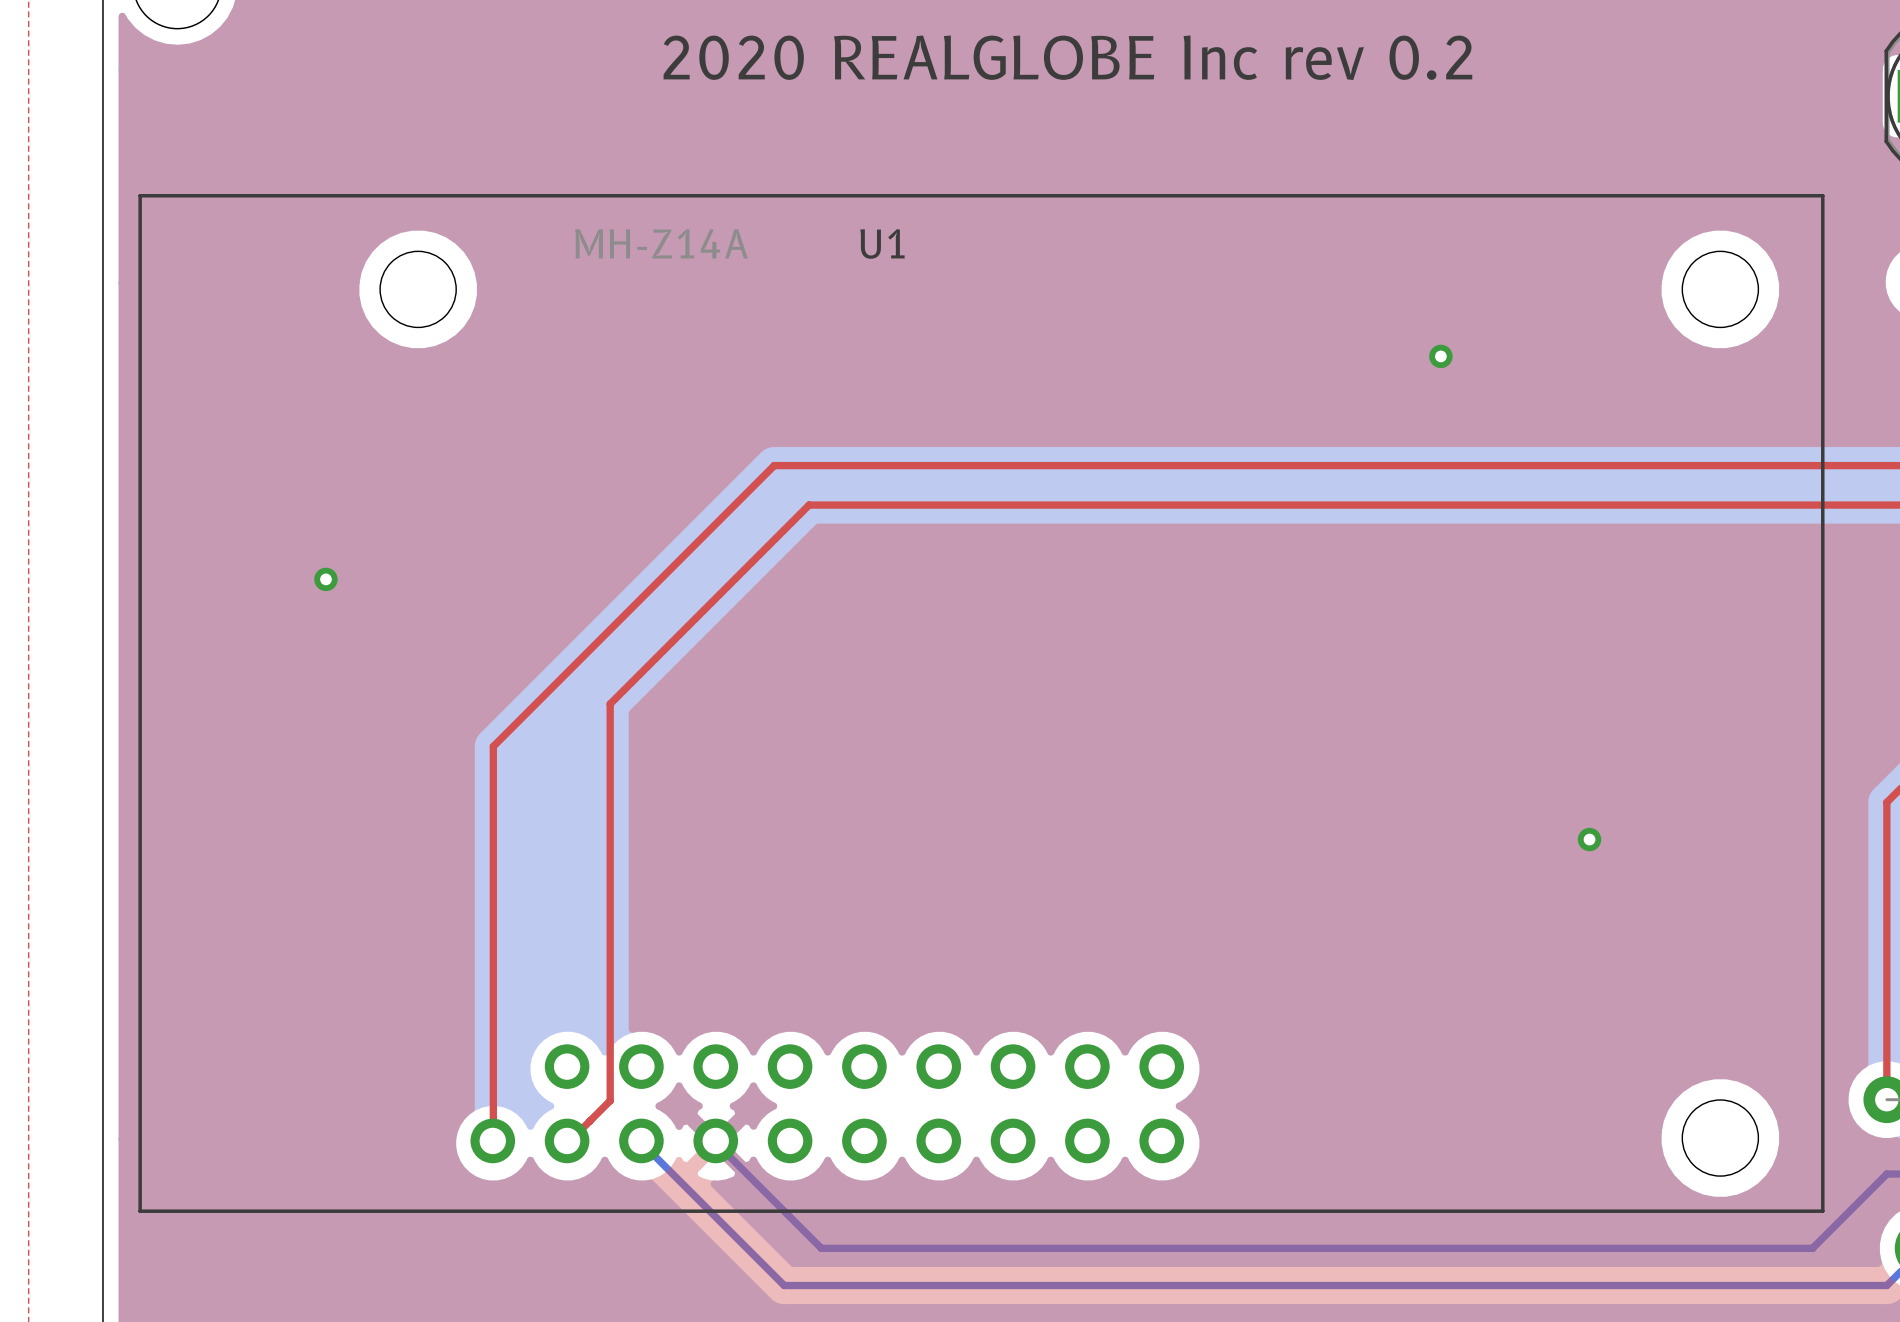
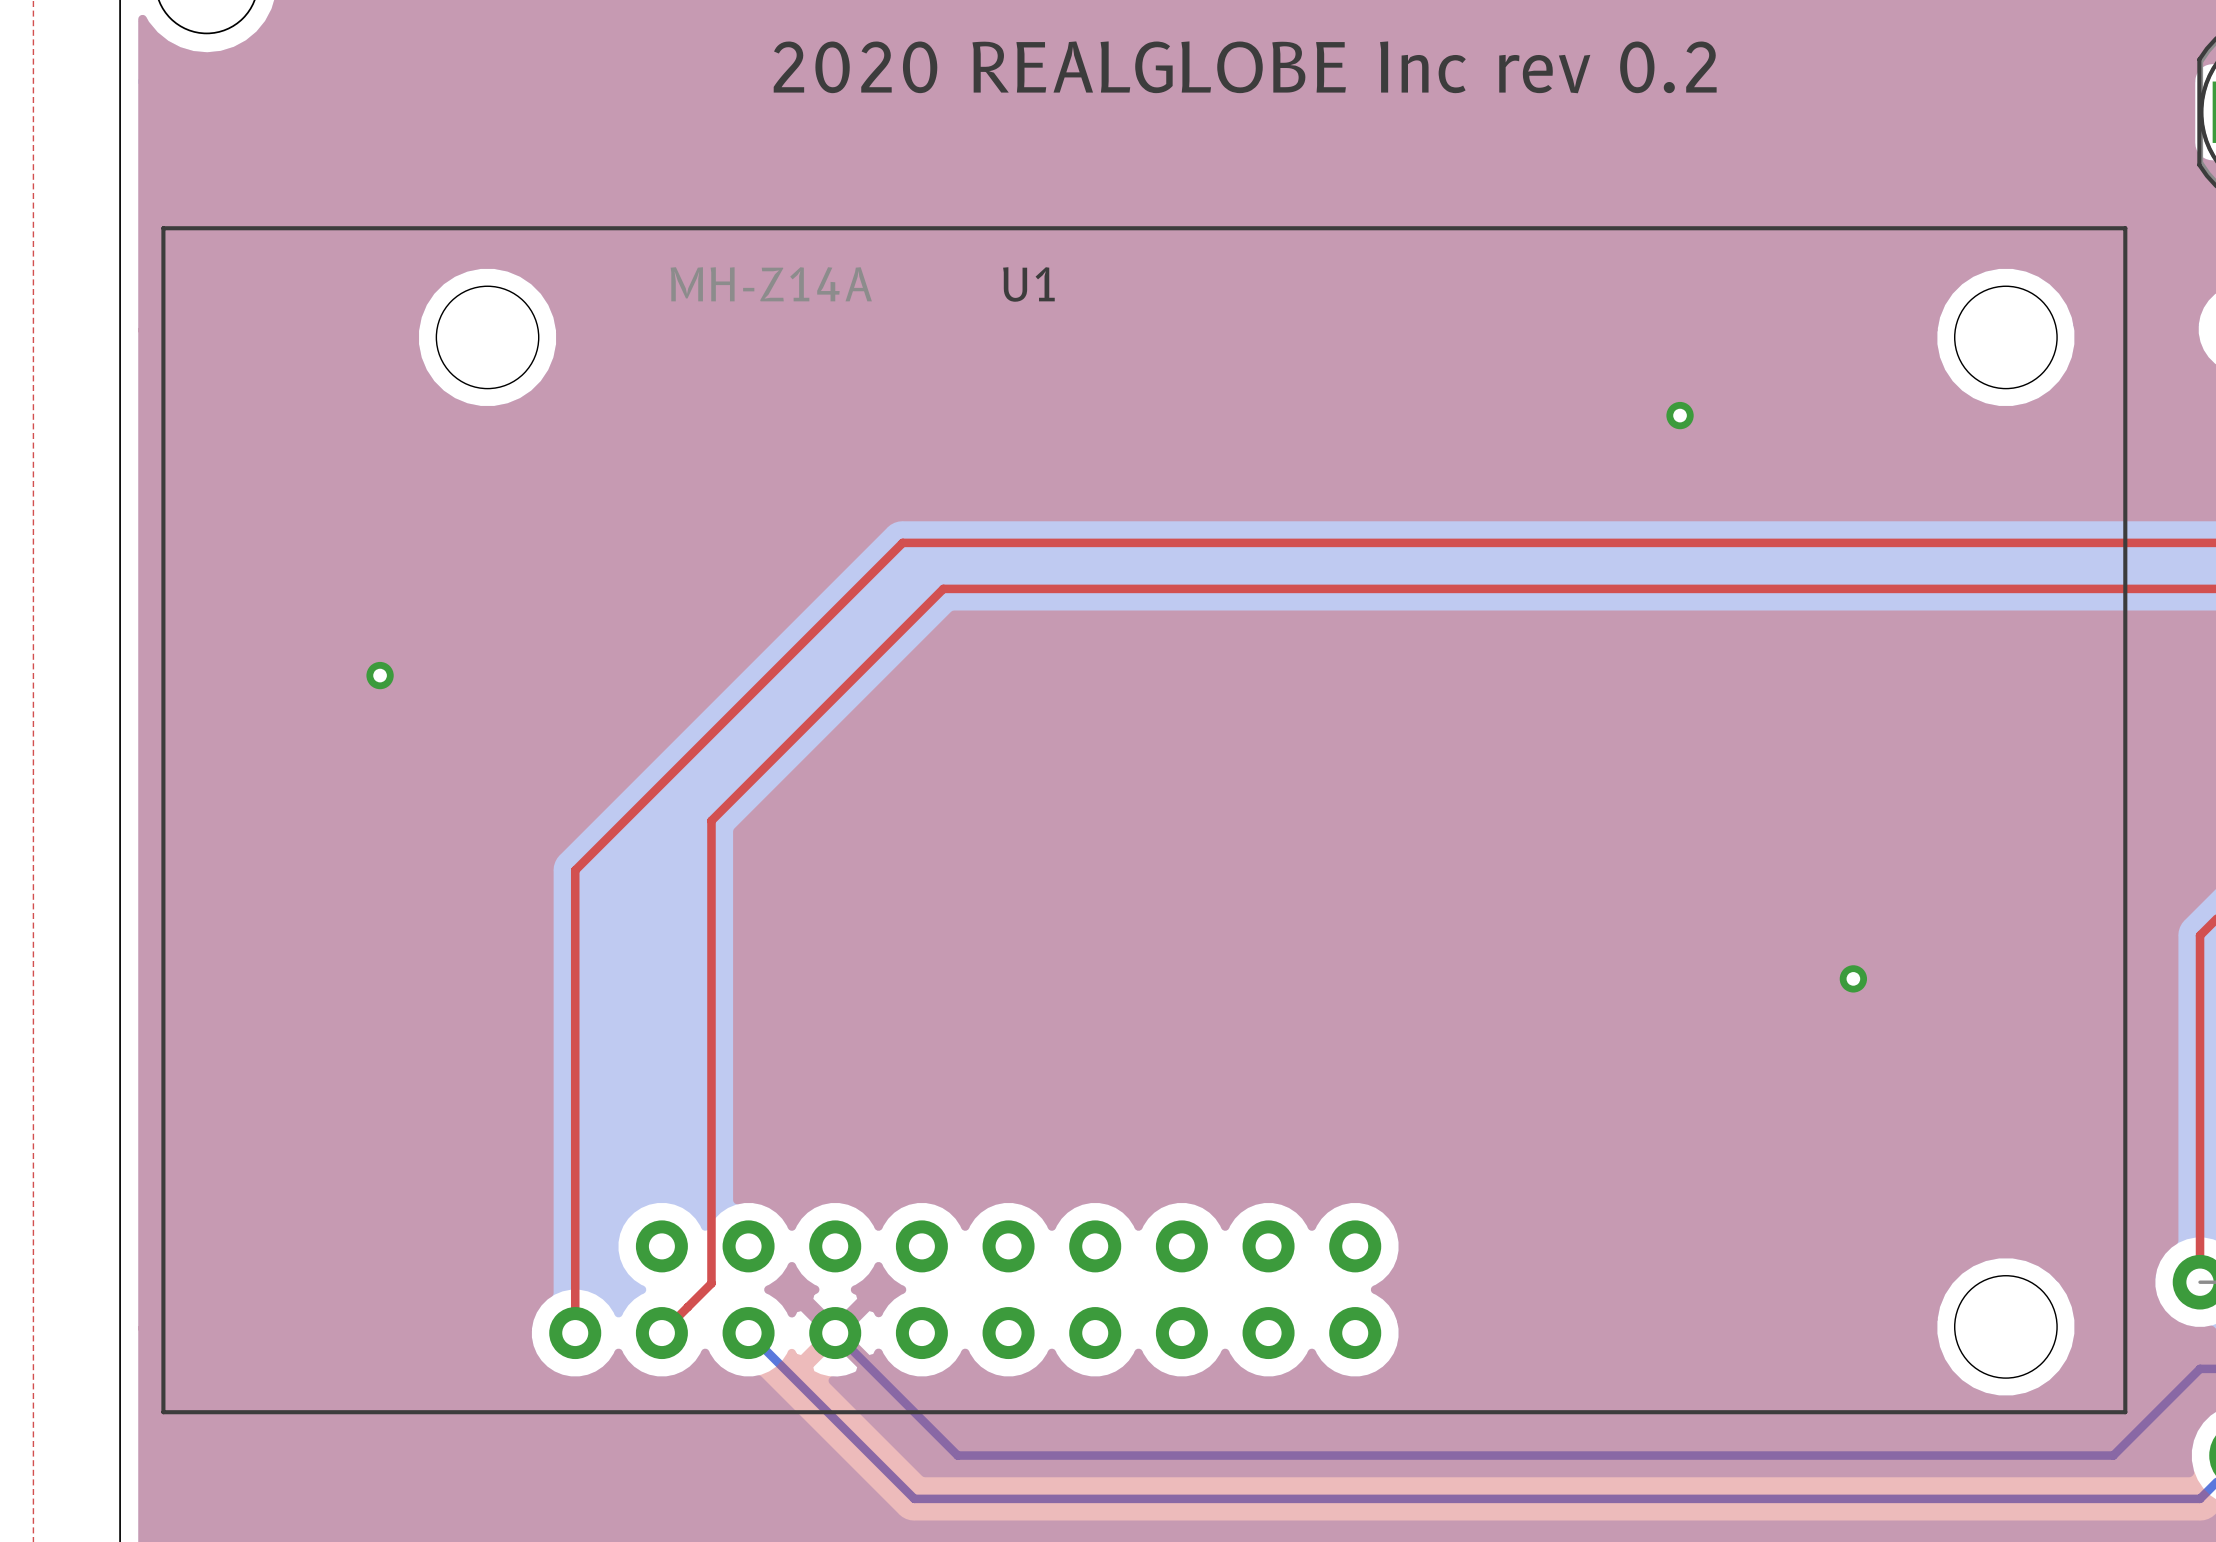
U1 footprint: [138, 194, 1825, 1213] -> [161, 226, 2128, 1415]

